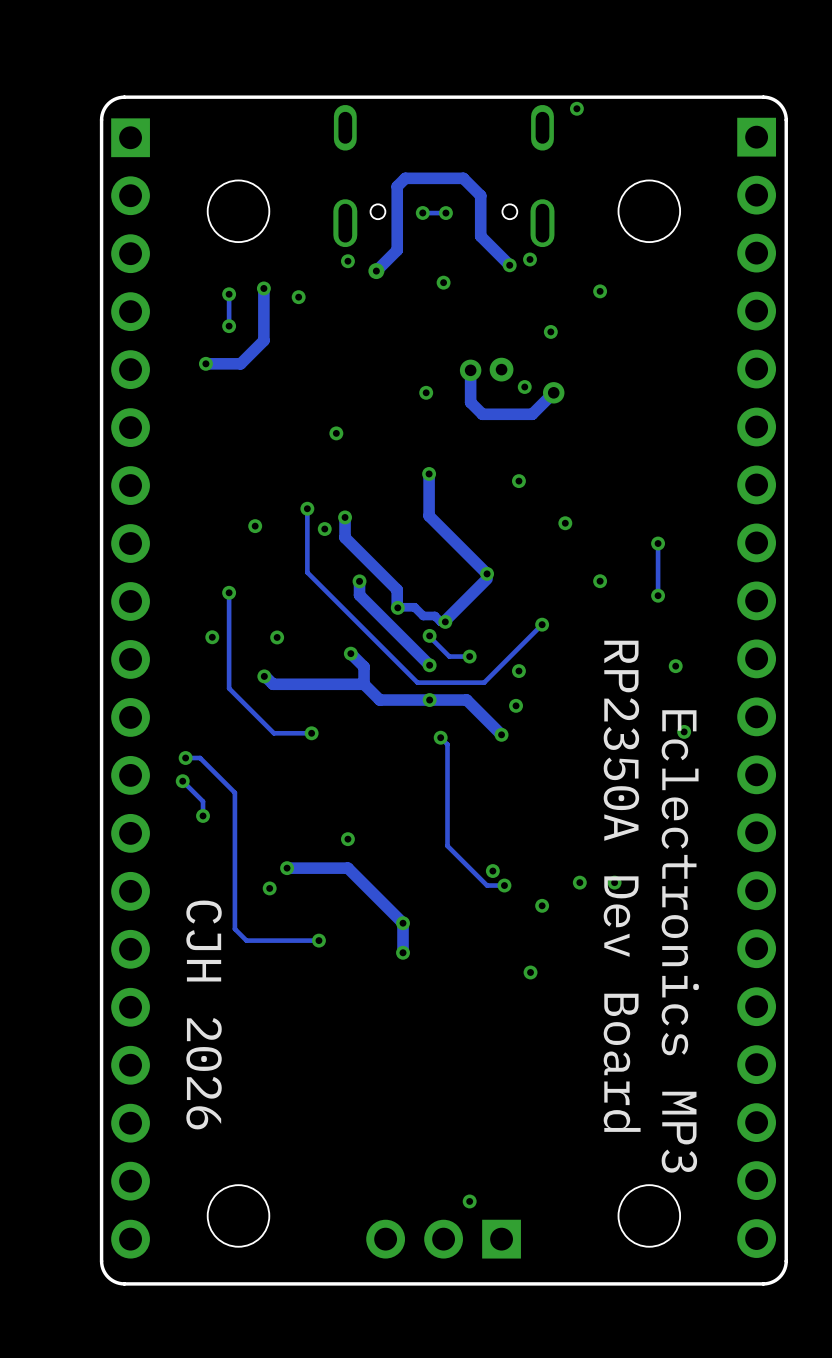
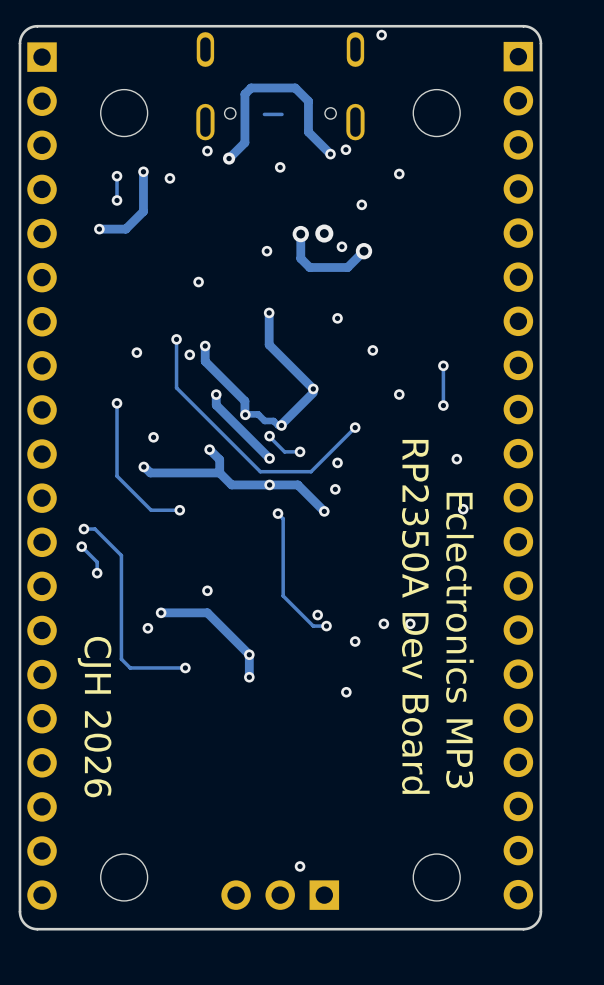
via: (422, 212) -> none
via: (445, 213) -> none
via: (212, 637) -> none

